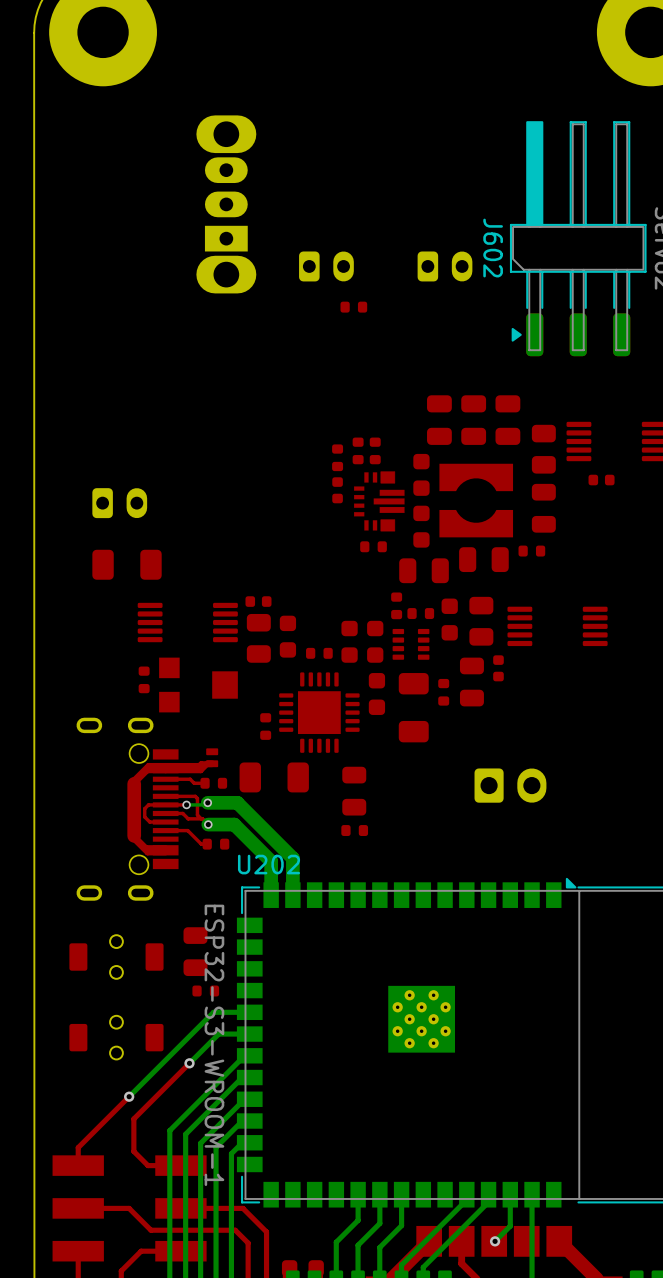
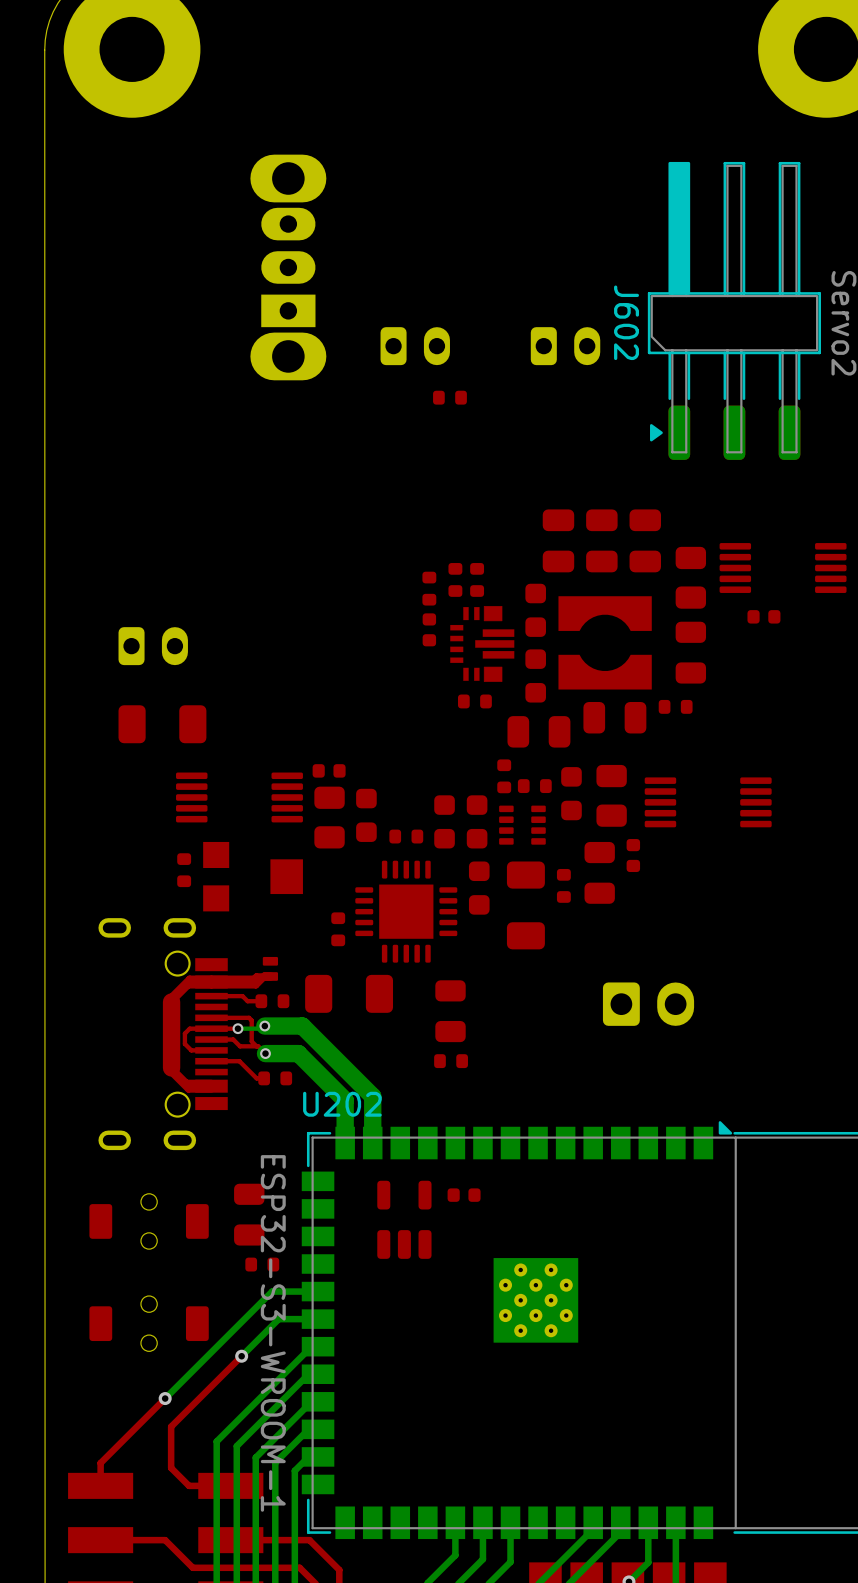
part: none -> (464, 1195)
part: none -> (404, 1219)

